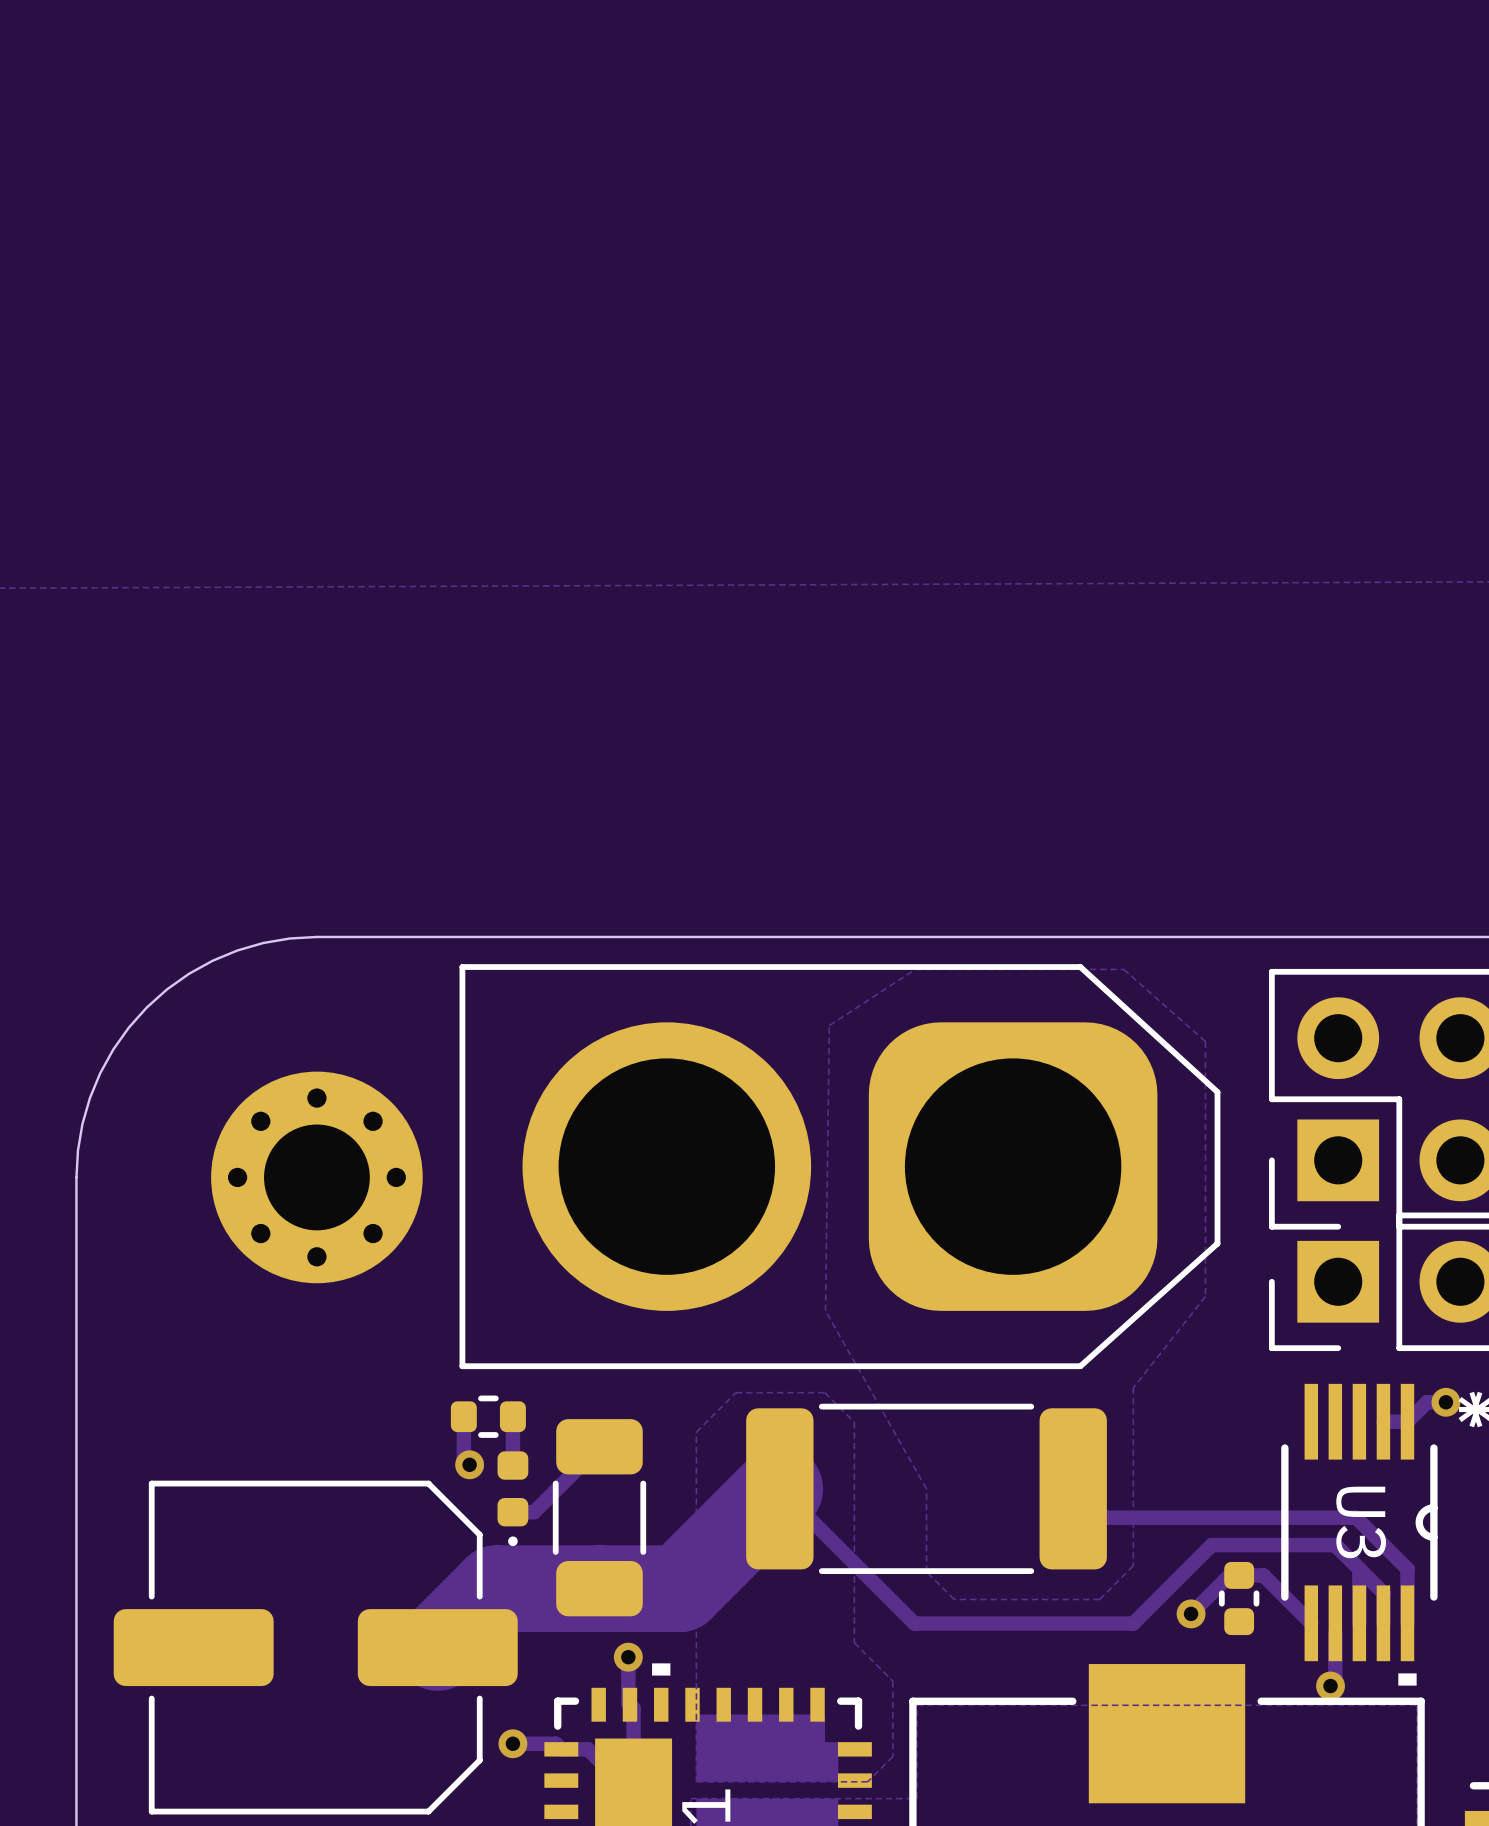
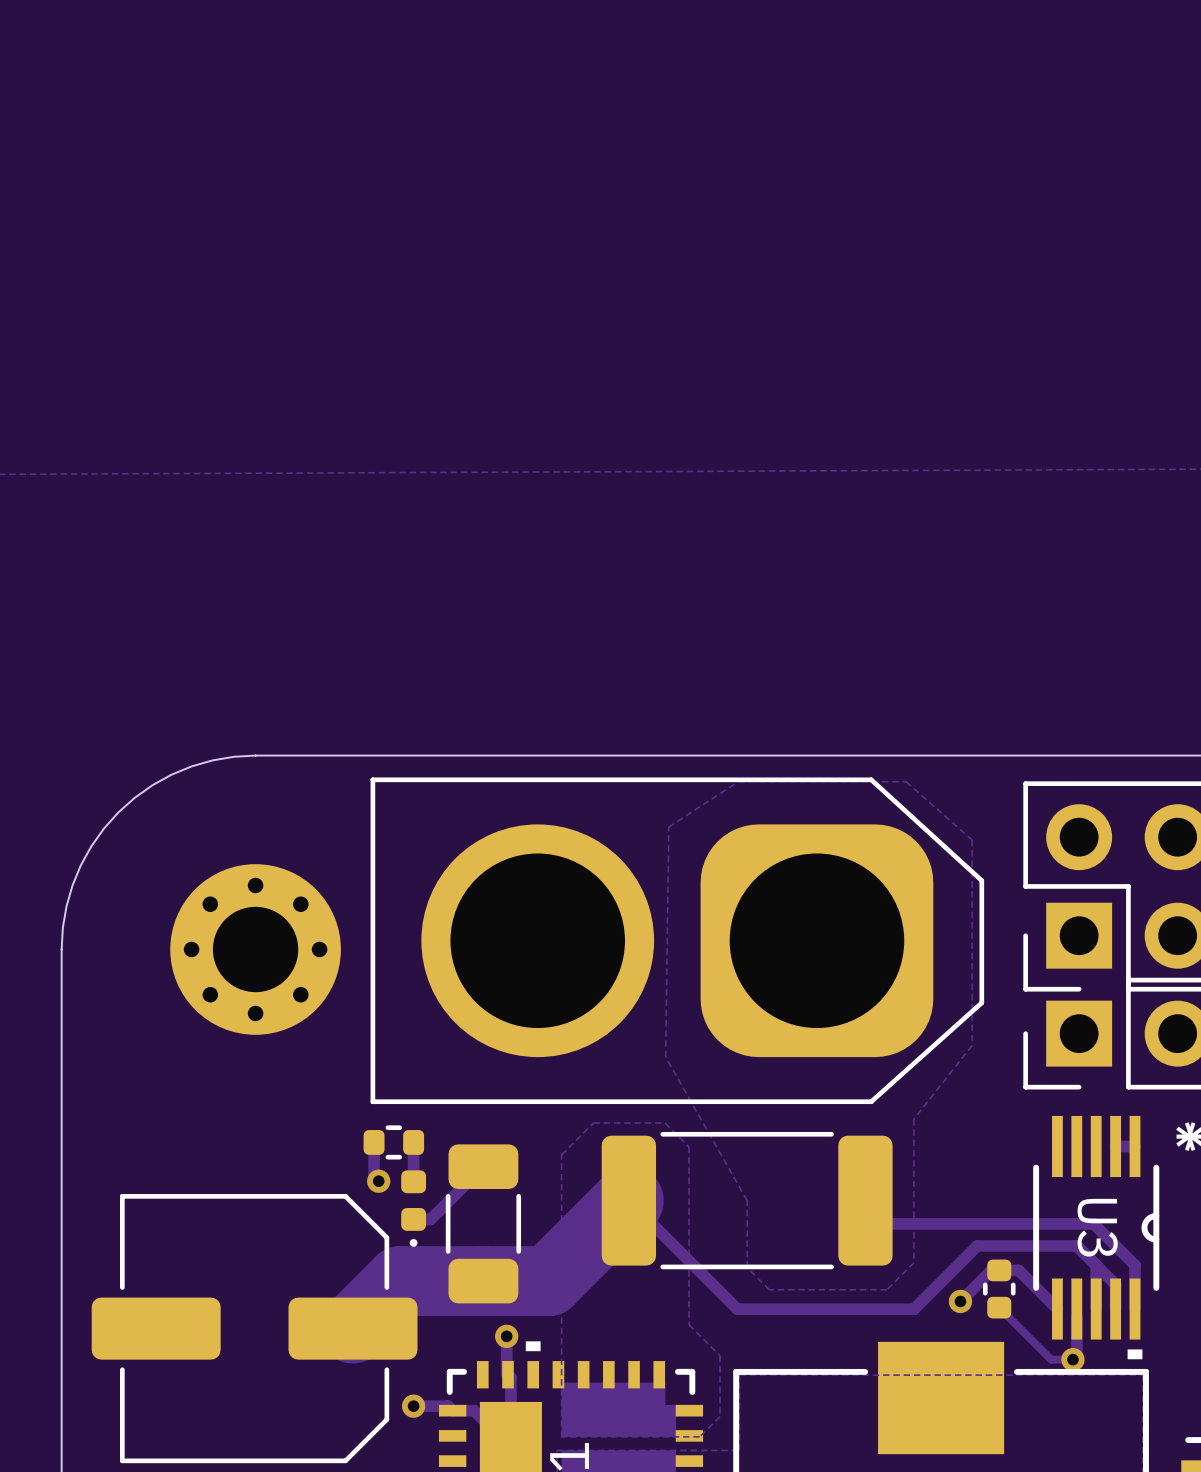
track: (1445, 1402) (1426, 1402) (1407, 1421) -> none
via: (1445, 1402) -> none
track: none -> (999, 1307) (1051, 1359) (1072, 1359)

